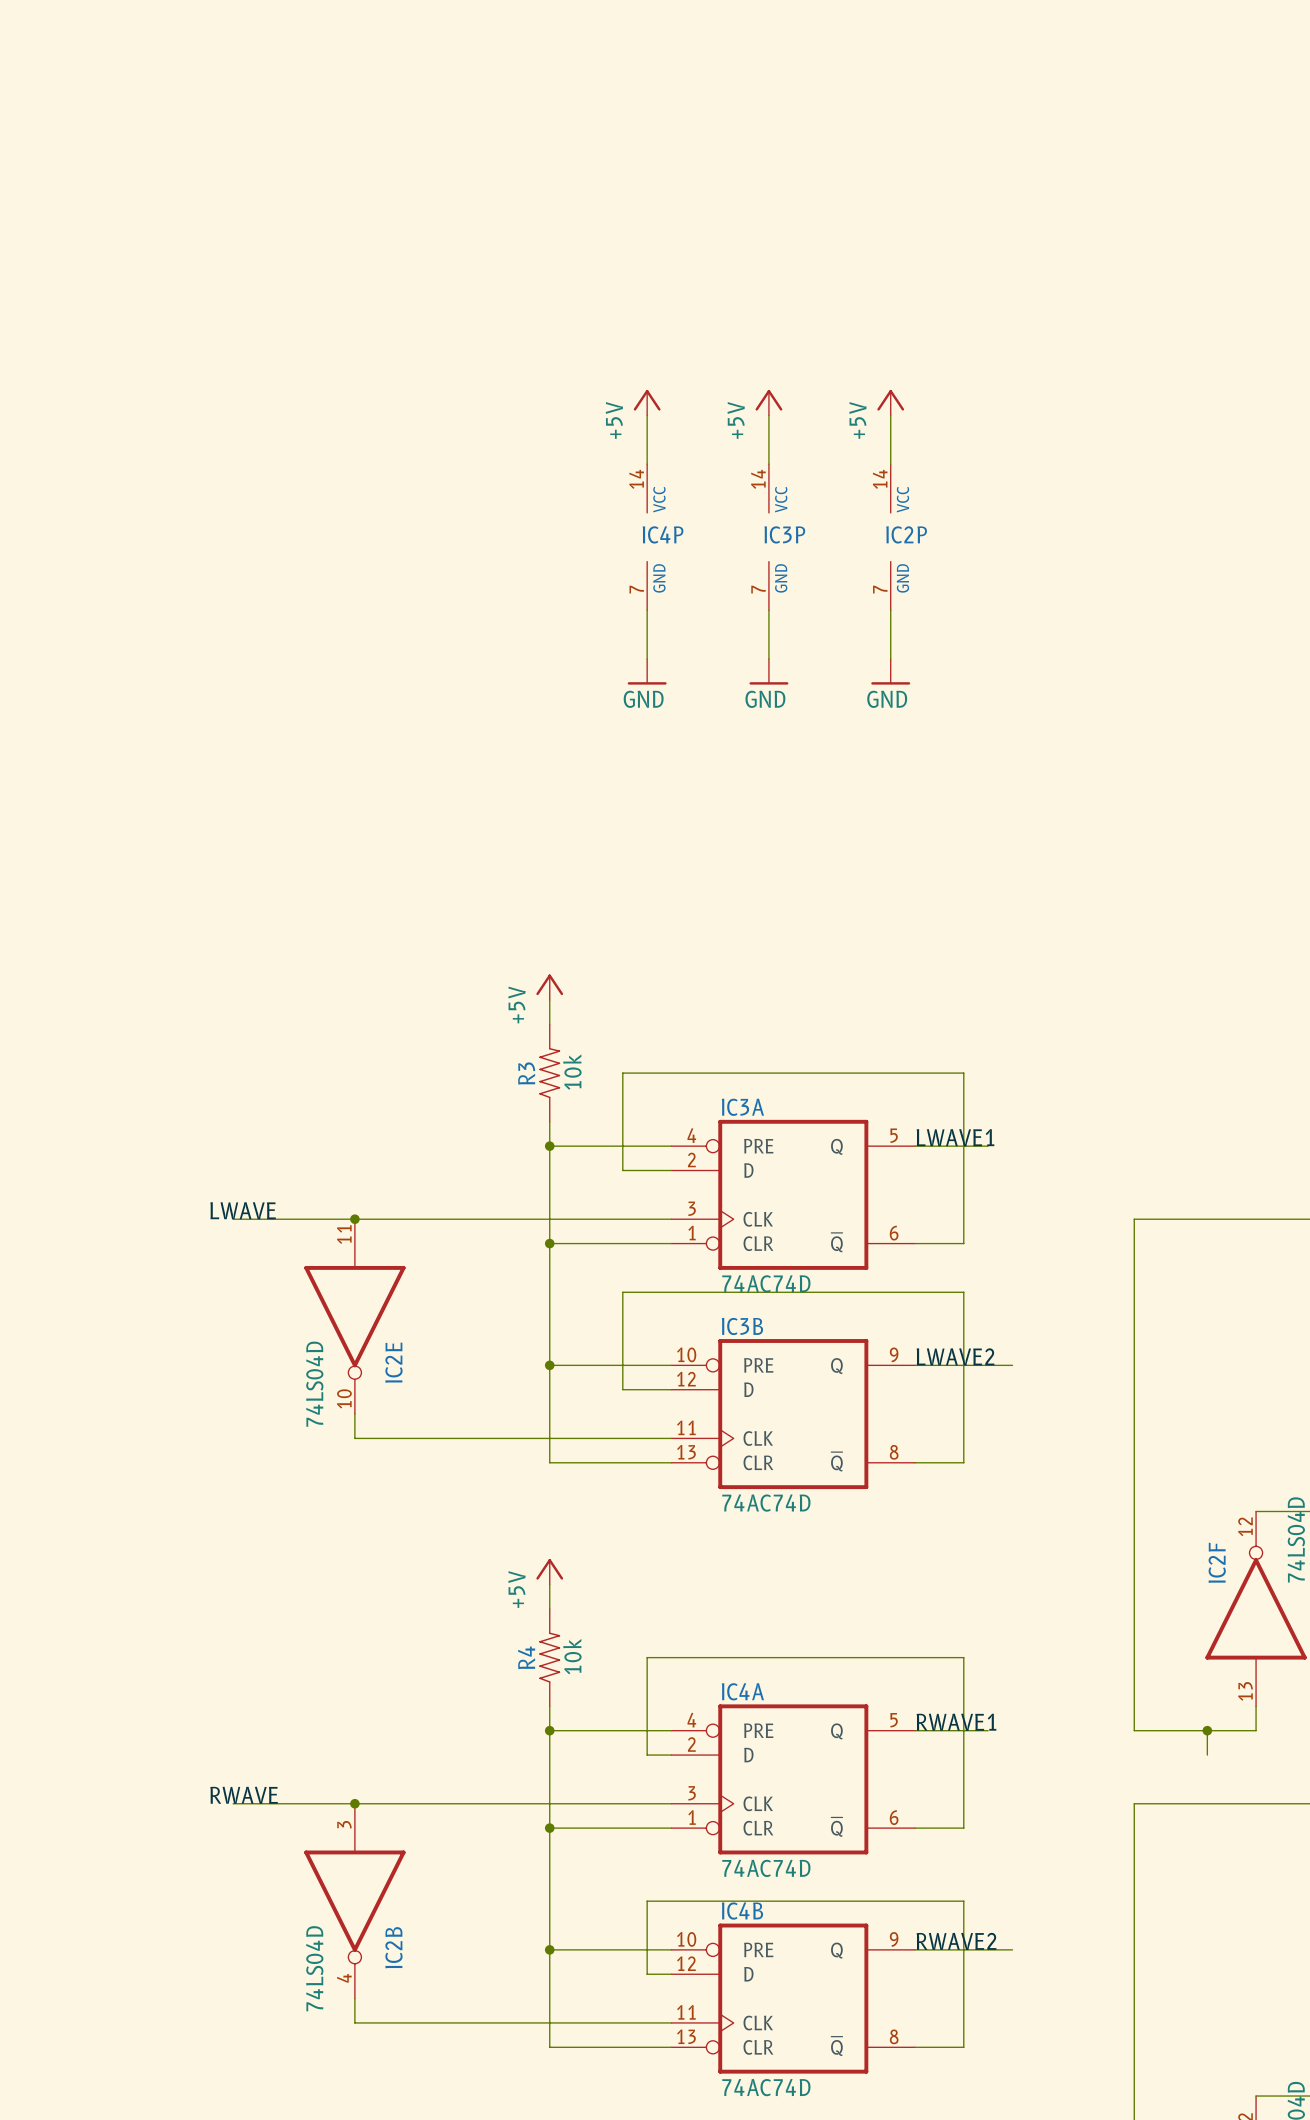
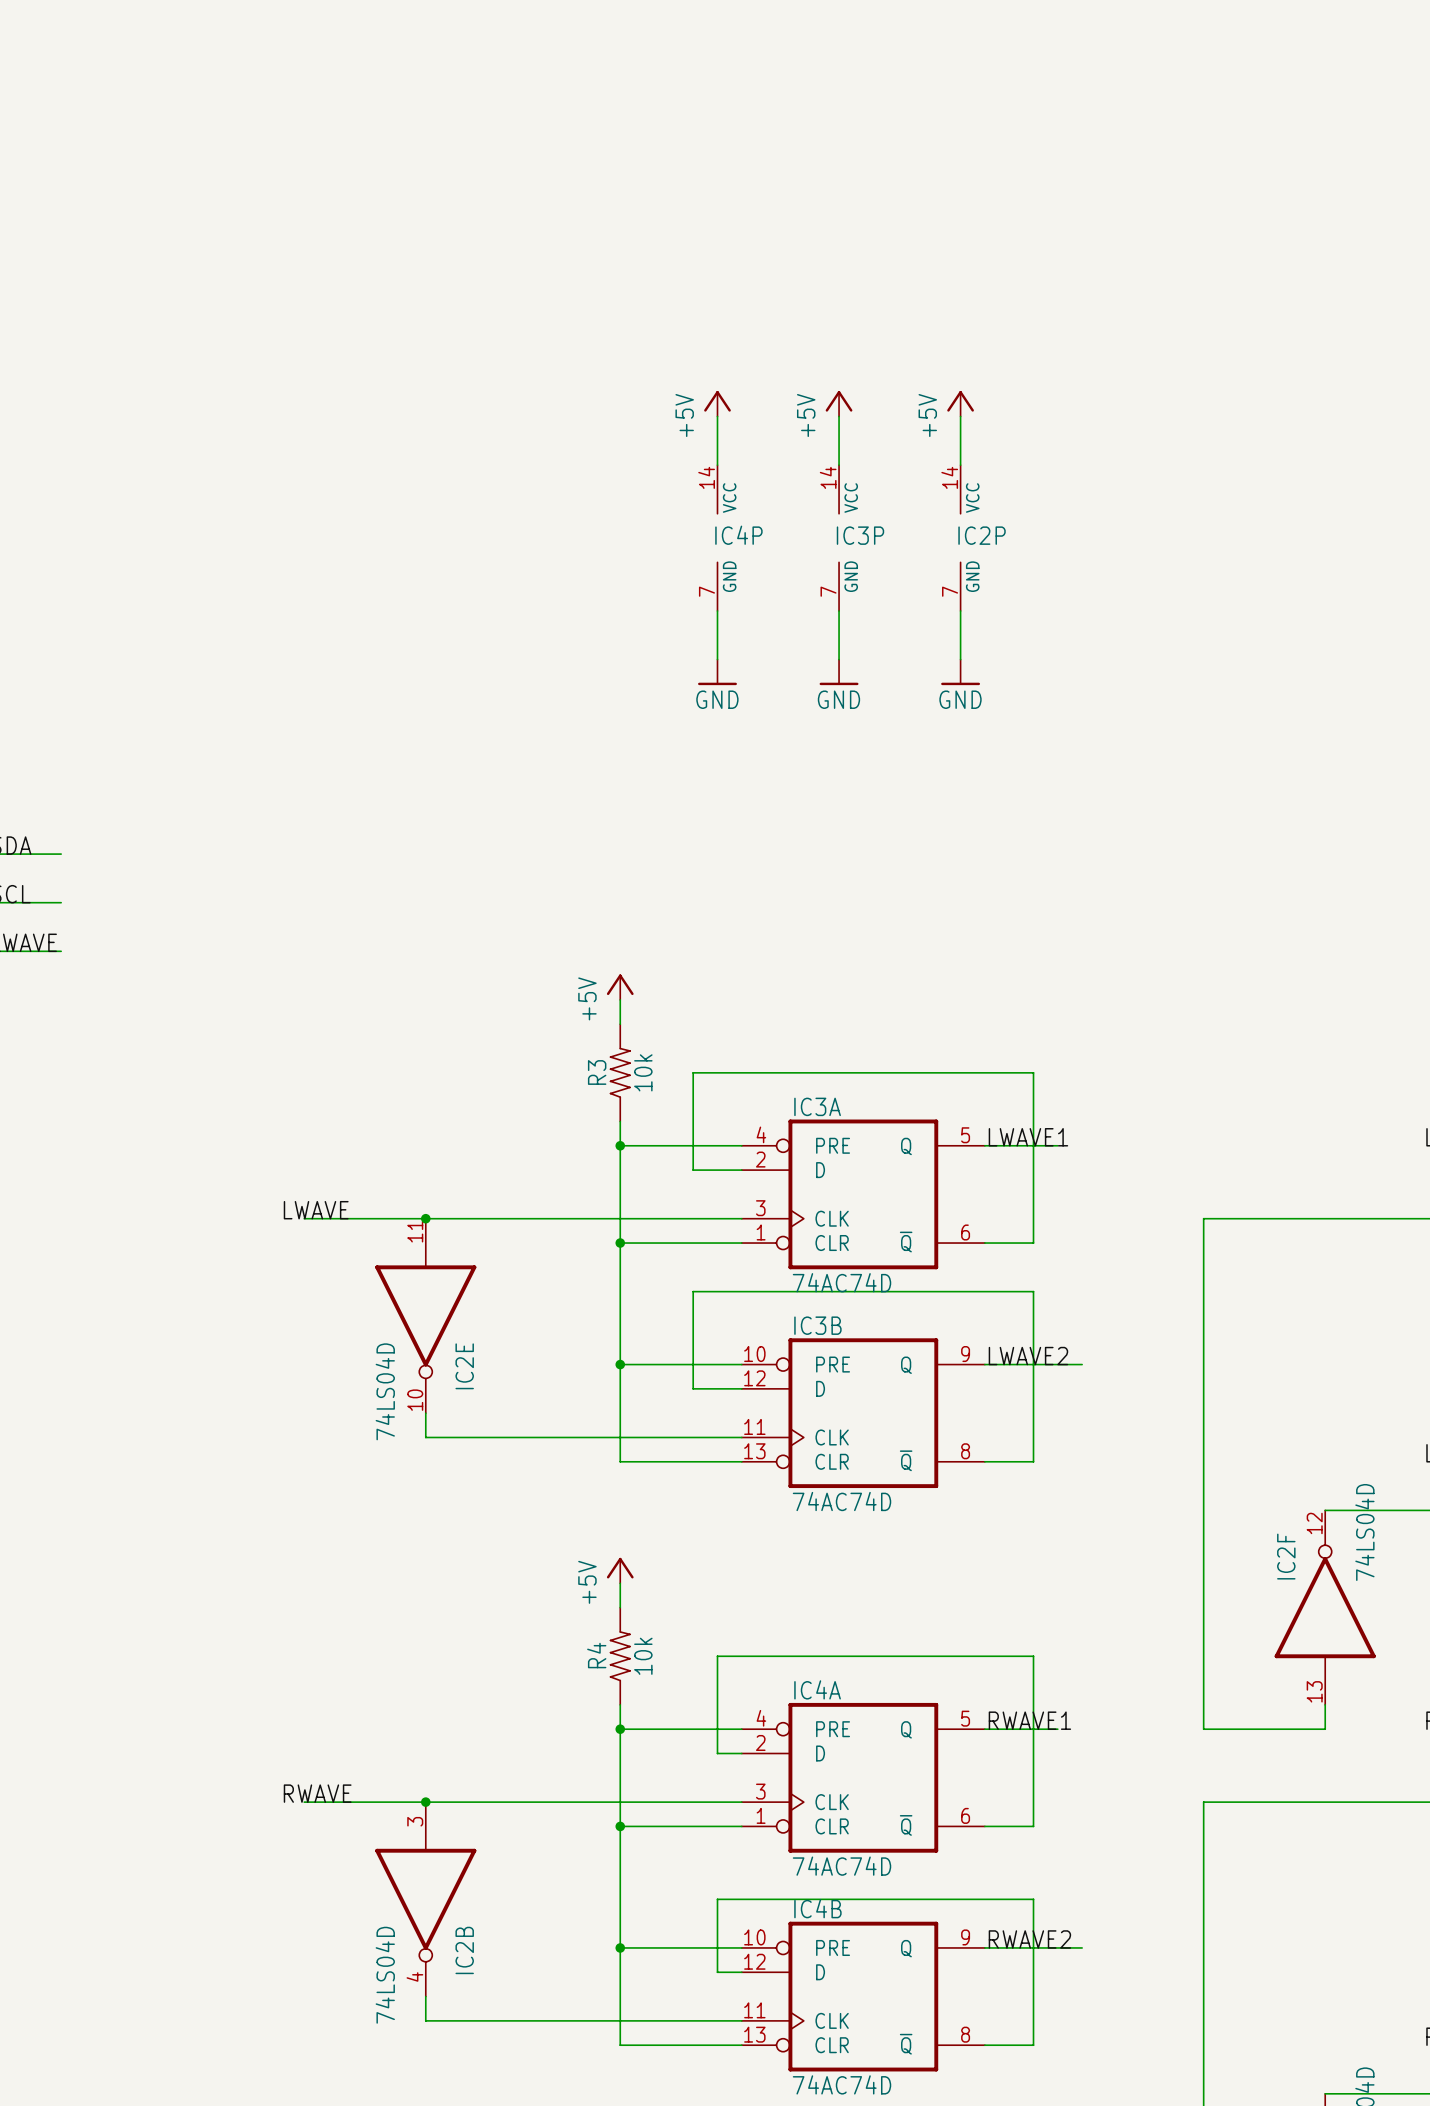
wire: (1207, 1730) (1207, 1755) -> none
junction: (1207, 1730) -> none

